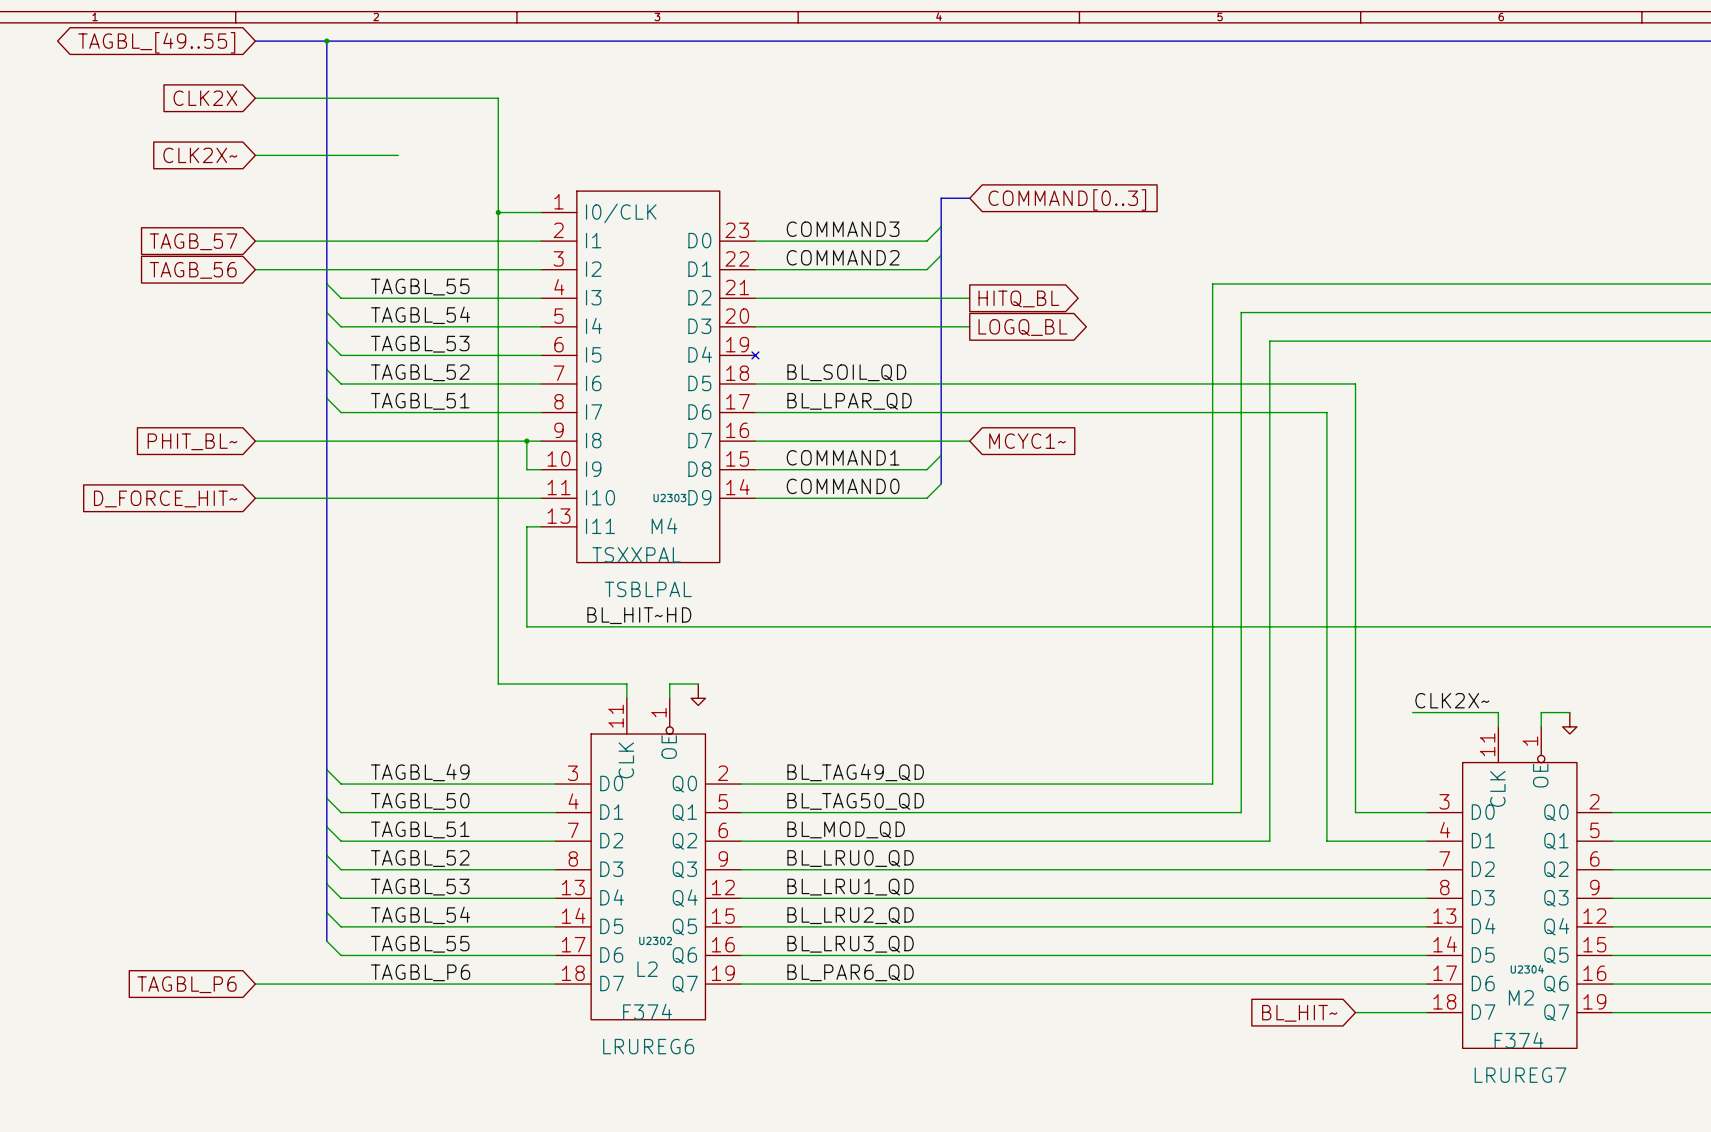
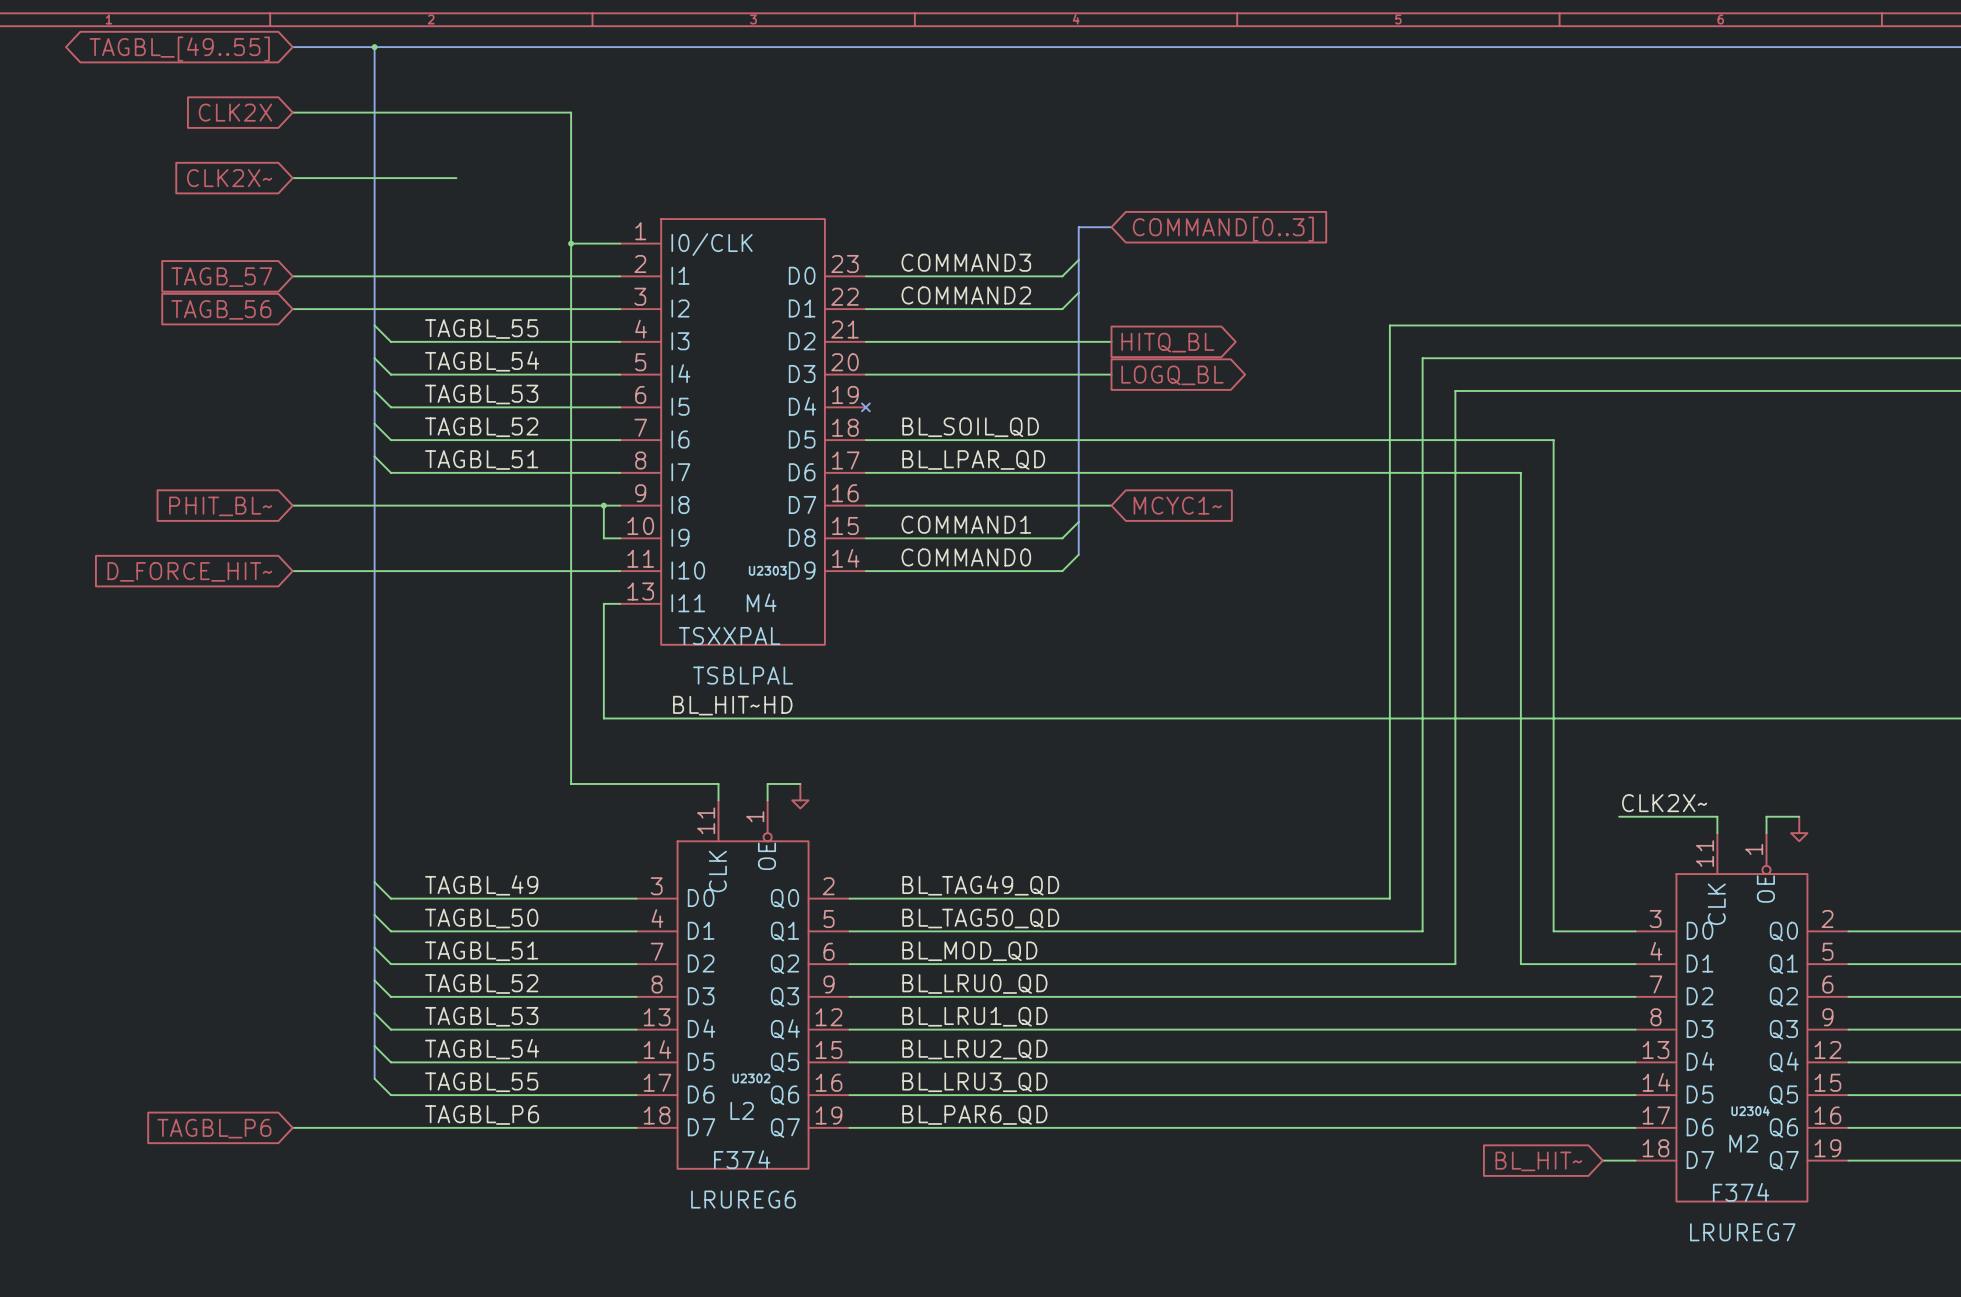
wire: (1355, 1012) (1398, 1012) -> none
global label position: BL_HIT~ (1299, 1013) -> BL_HIT~ (1538, 1161)

